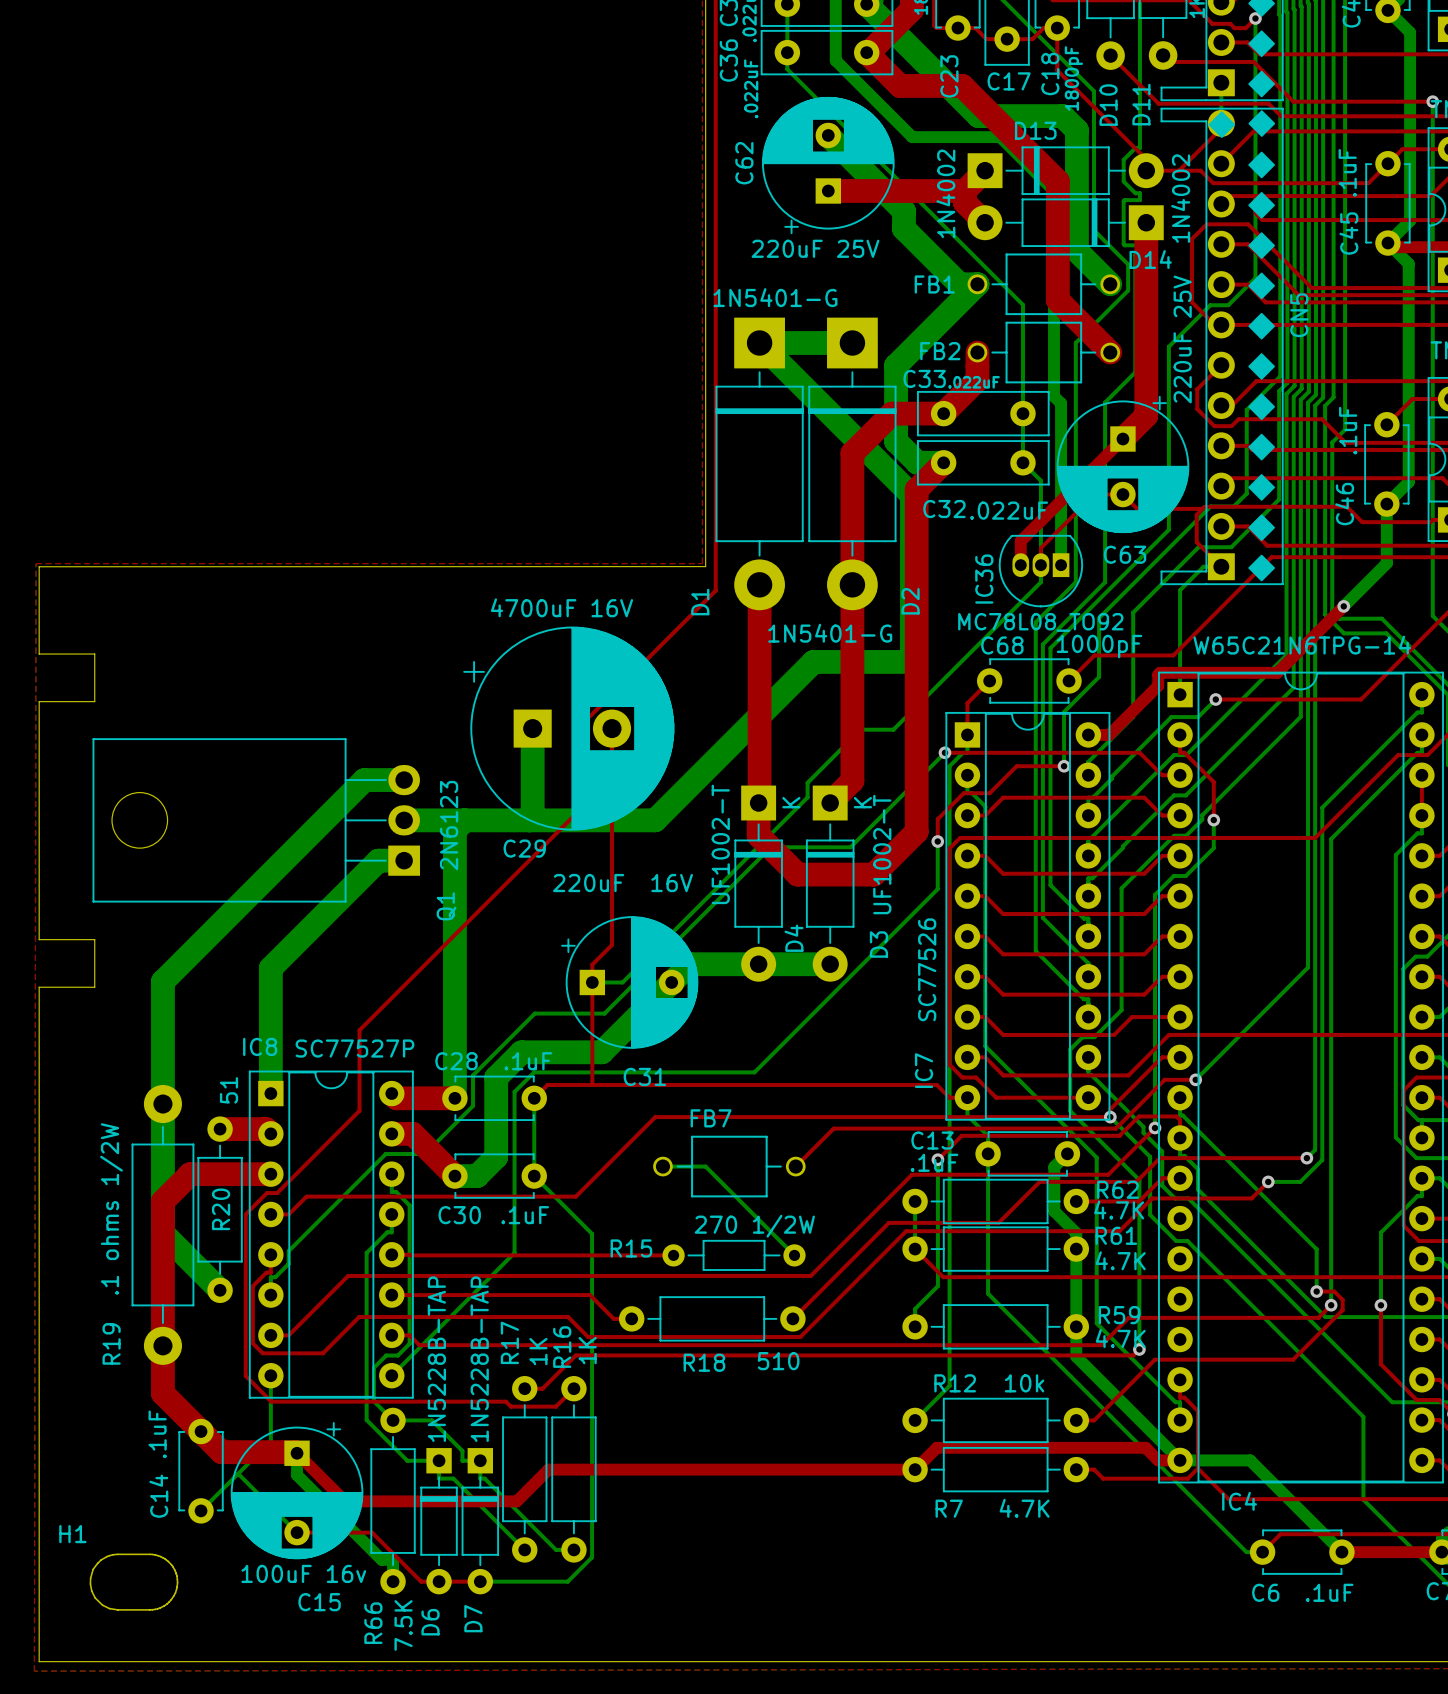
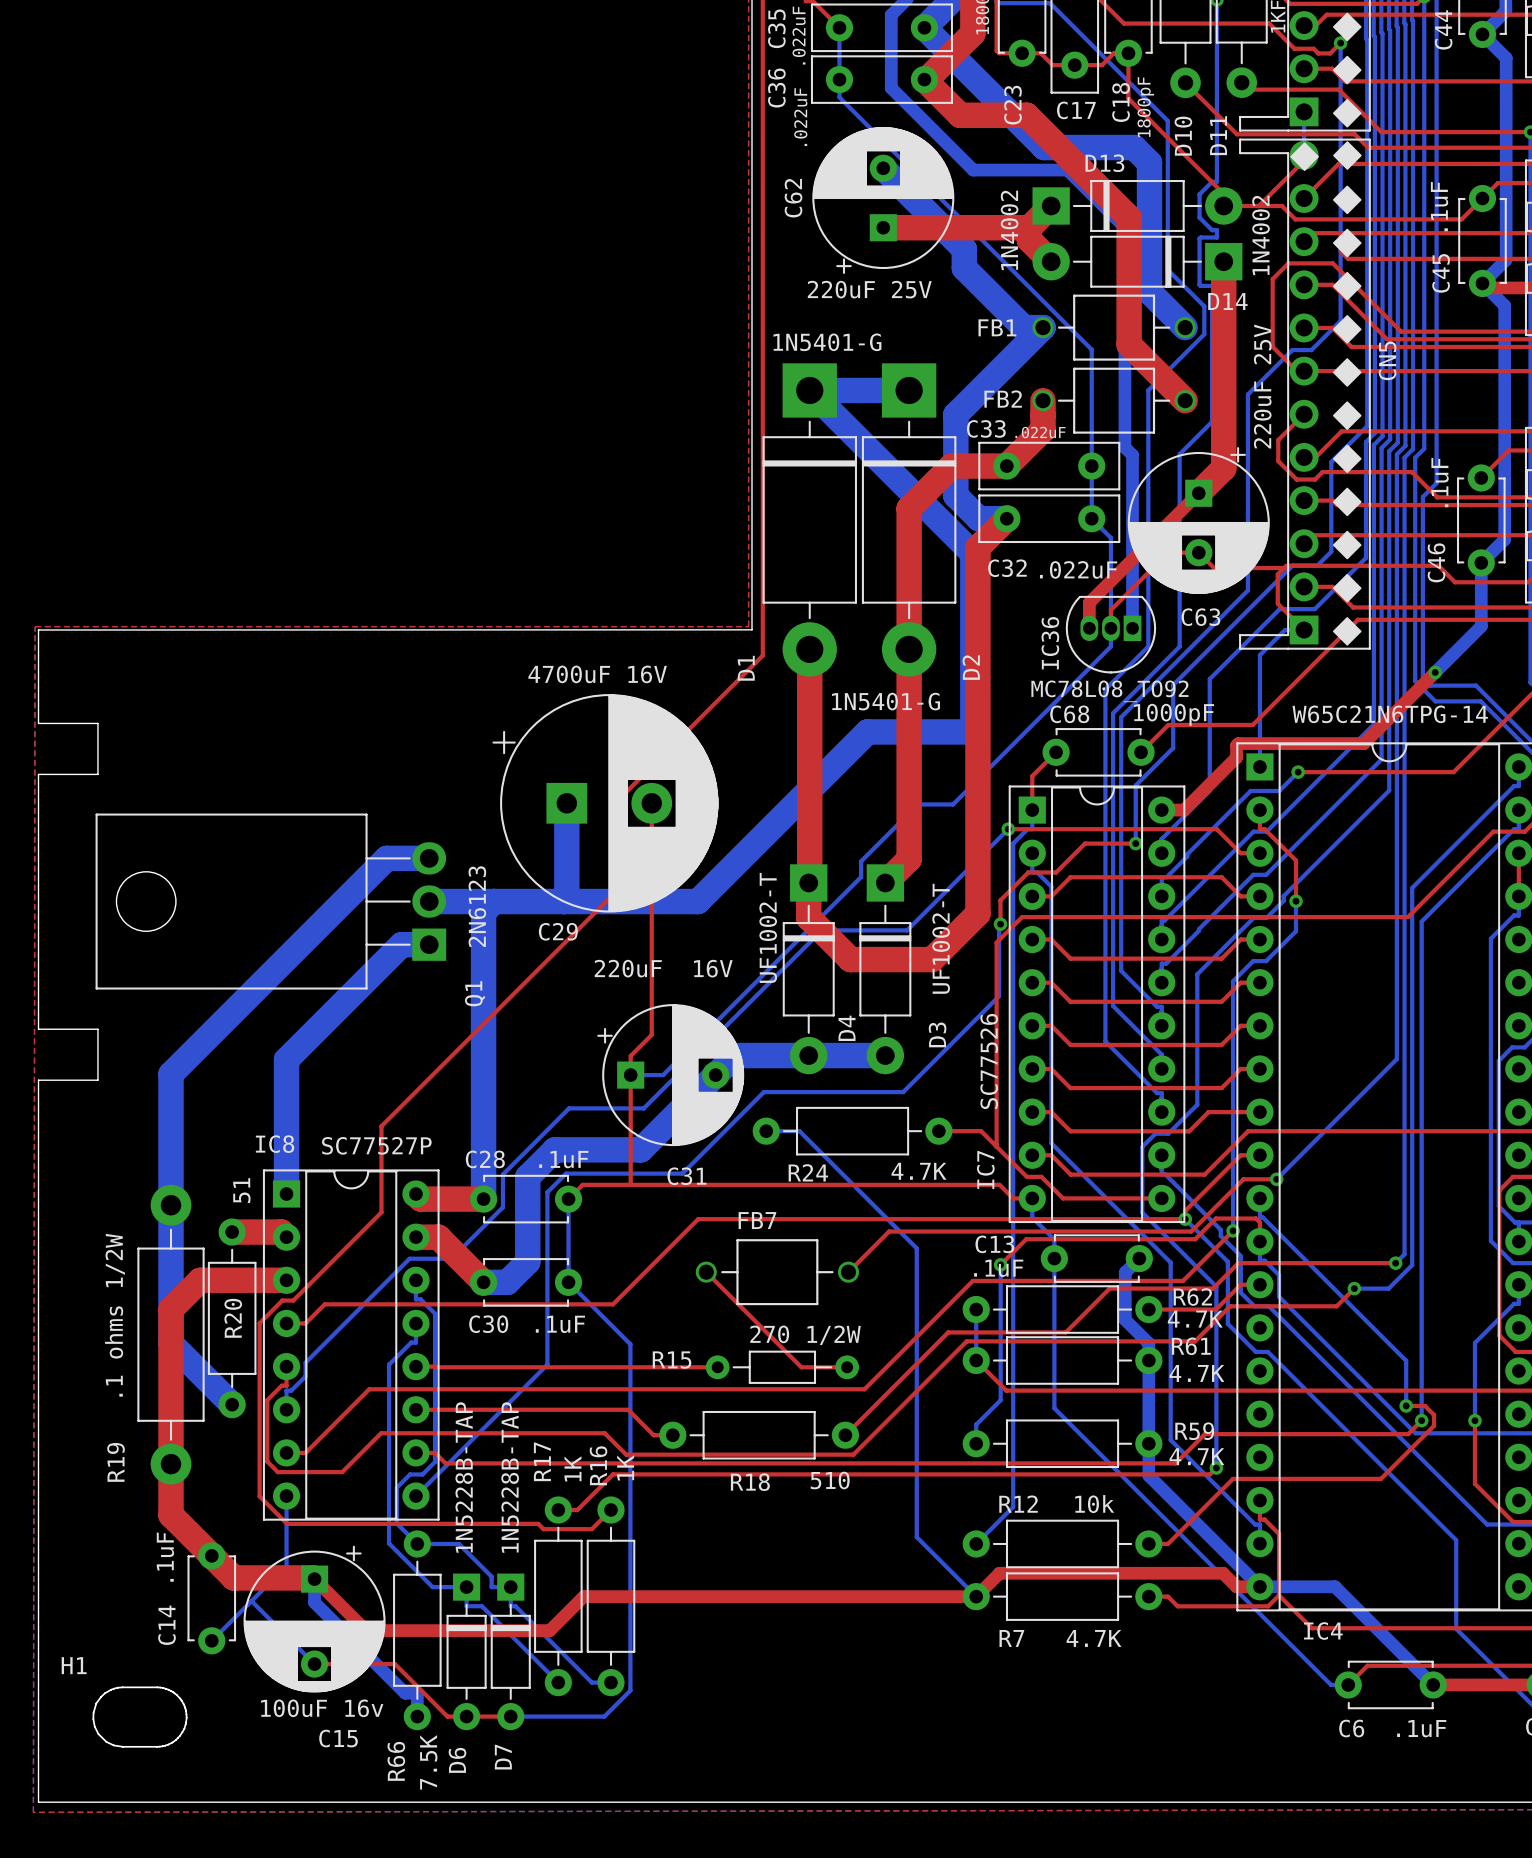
D4 text: K (791, 802) -> none
D3 text: K (862, 802) -> none
top track: (1318, 834) (1315, 837) (960, 837) (949, 848) (949, 1064) (962, 1077) -> (1407, 917) (1022, 917) (996, 942) (996, 1146)
bottom track: (937, 841) (937, 889) (754, 1072) (534, 1072) (531, 1074) -> (999, 922) (999, 996) (903, 1092) (763, 1092) (682, 1173) (566, 1173)
bottom track: none -> (766, 1131) (799, 1131) (916, 1248) (916, 1537) (976, 1596)
R24: none -> 4.7K (852, 1131)
top track: none -> (938, 1131) (981, 1131) (1026, 1176)
bottom track: (662, 1166) (705, 1166) (794, 1255) -> none
top track: none -> (706, 1272) (801, 1367) (847, 1367)

